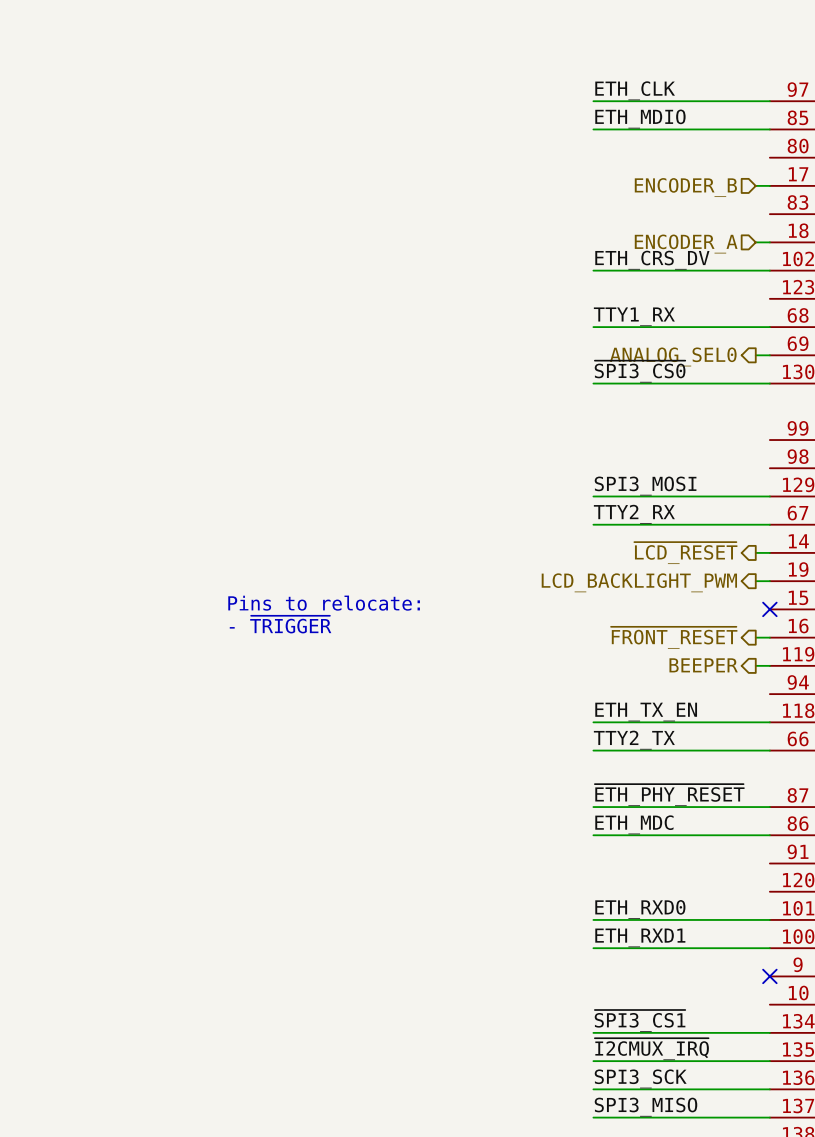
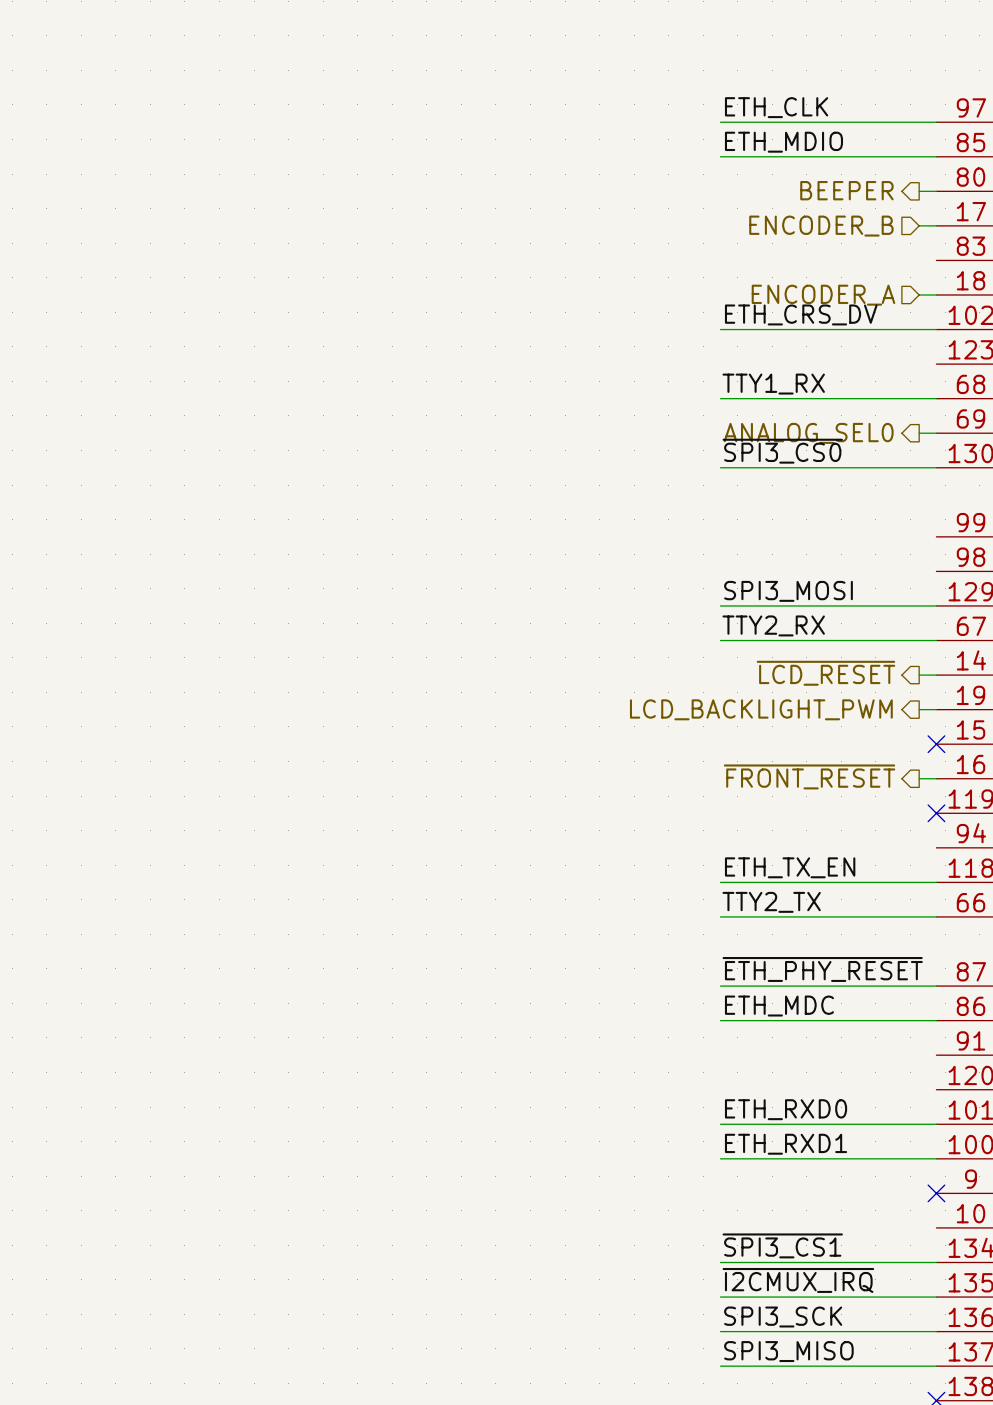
hierarchical label: none -> BEEPER (846, 190)
wire: none -> (919, 191) (936, 191)
text: Pins to relocate: (324, 603) -> none
text: - ~{TRIGGER} (280, 624) -> none
hierarchical label: BEEPER (703, 665) -> none
wire: (755, 665) (769, 665) -> none
no-connect mark: none -> (936, 813)

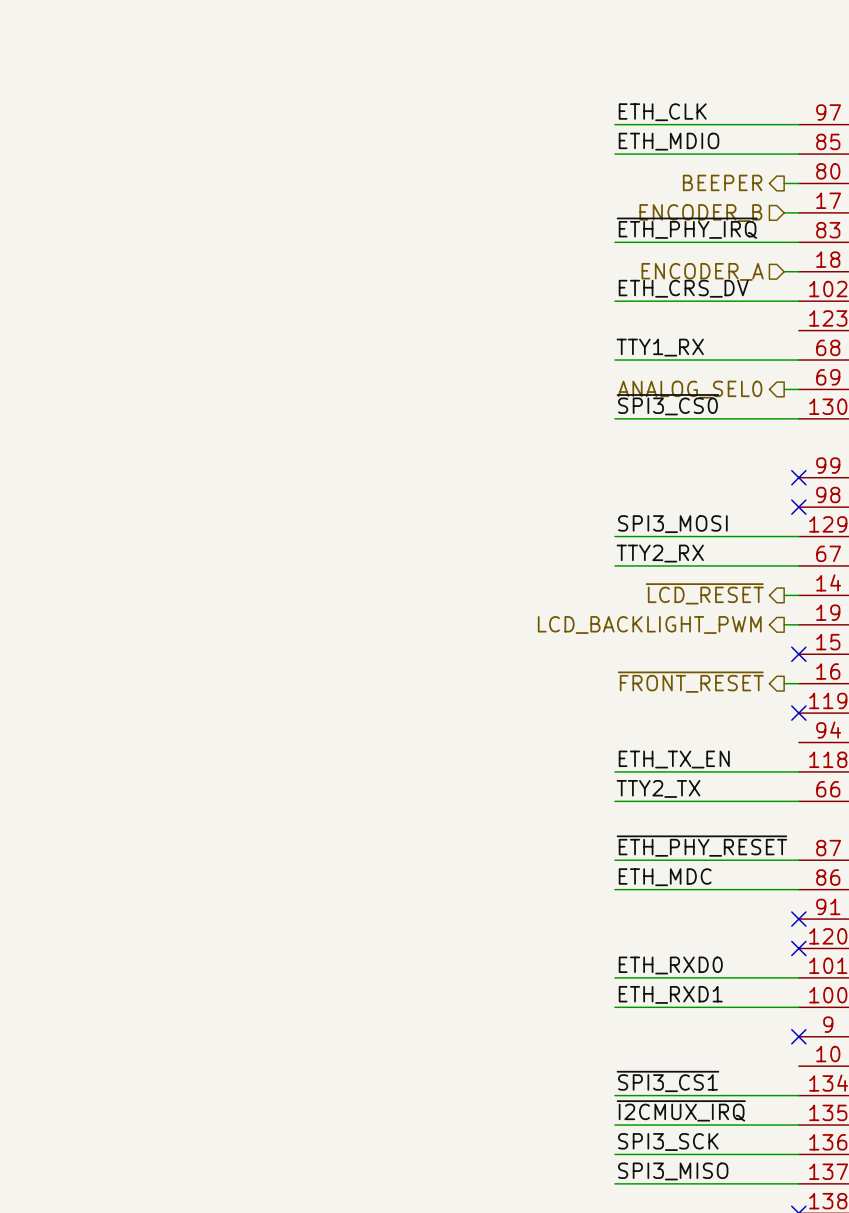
label: none -> ~{ETH_PHY_IRQ} (687, 228)
wire: none -> (614, 242) (798, 242)
no-connect mark: none -> (798, 477)
no-connect mark: none -> (798, 507)
no-connect mark: none -> (798, 919)
no-connect mark: none -> (798, 948)

